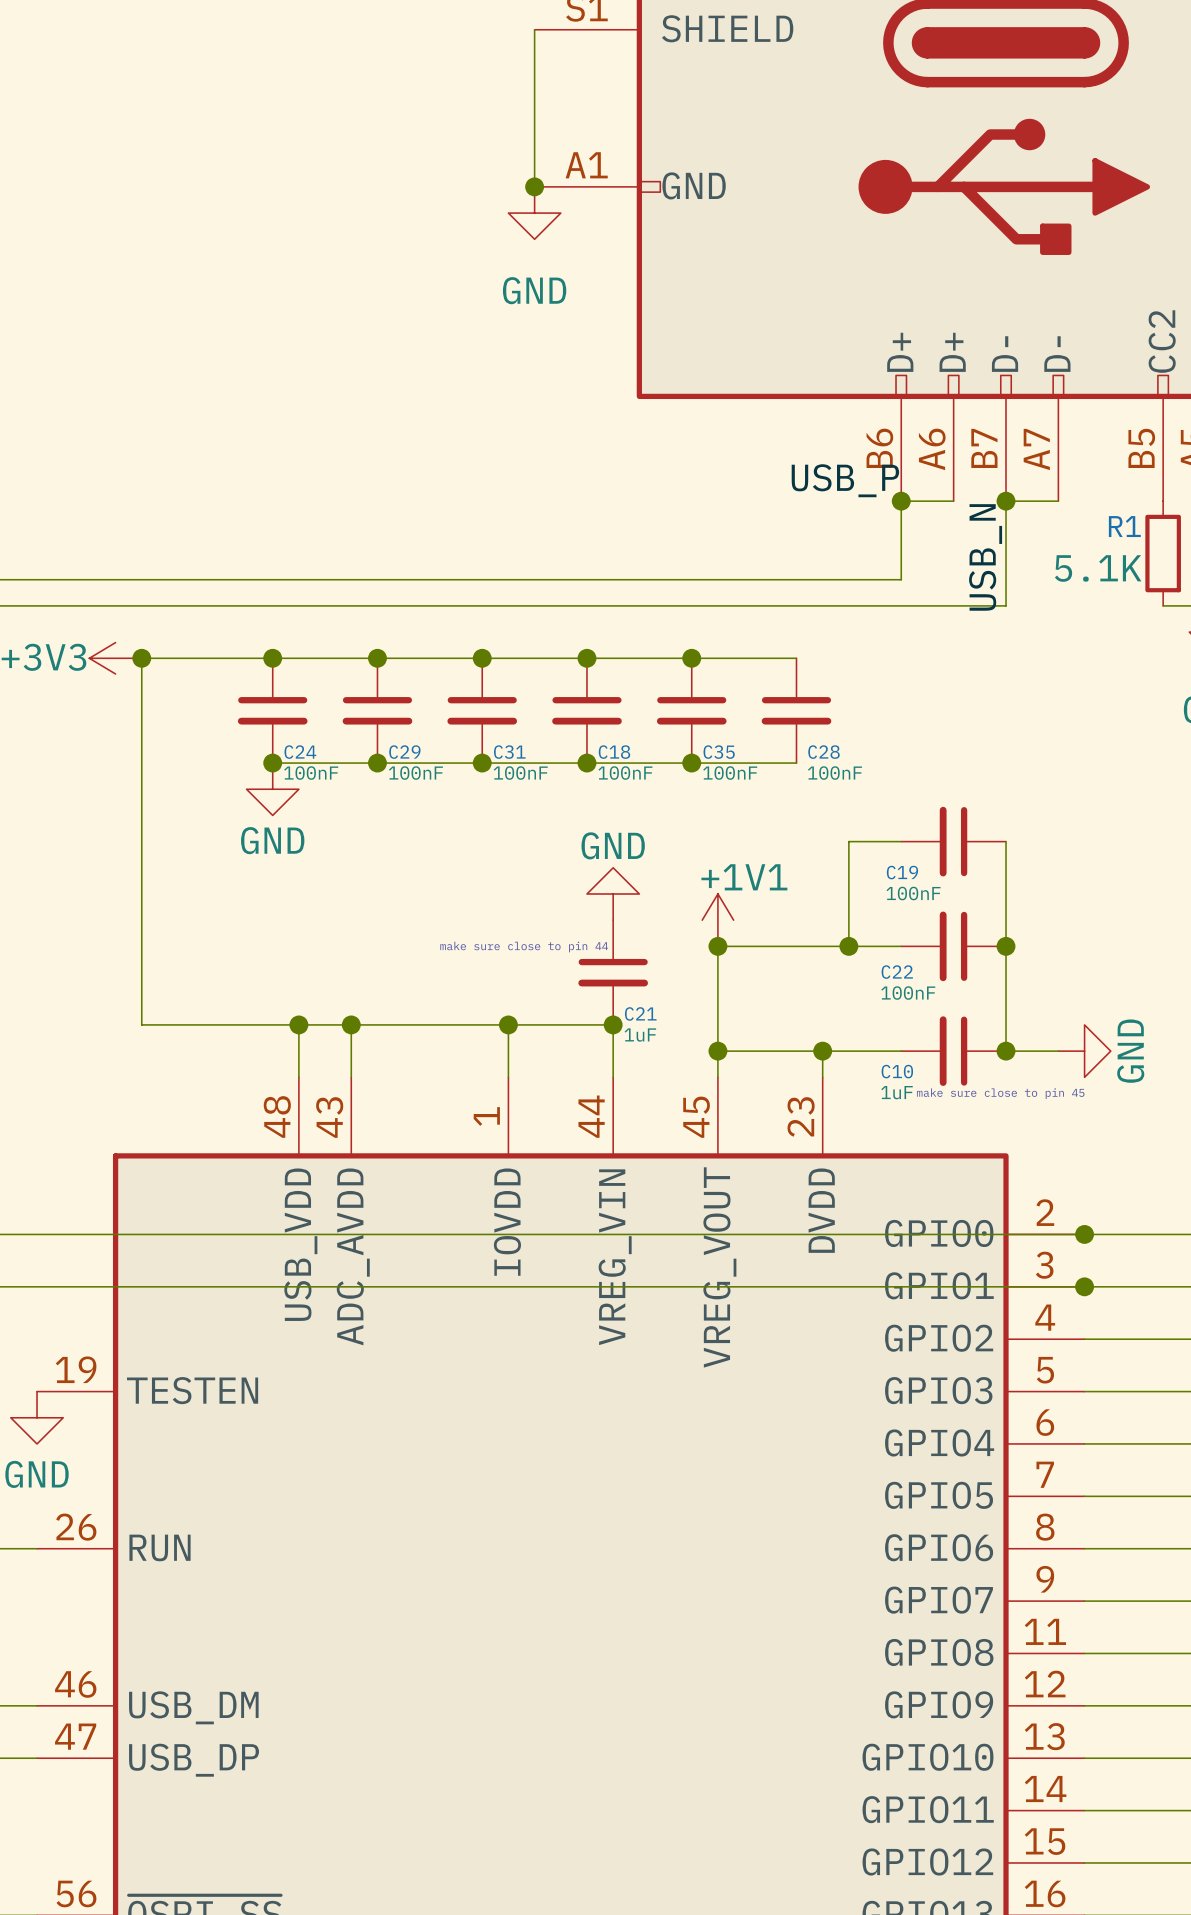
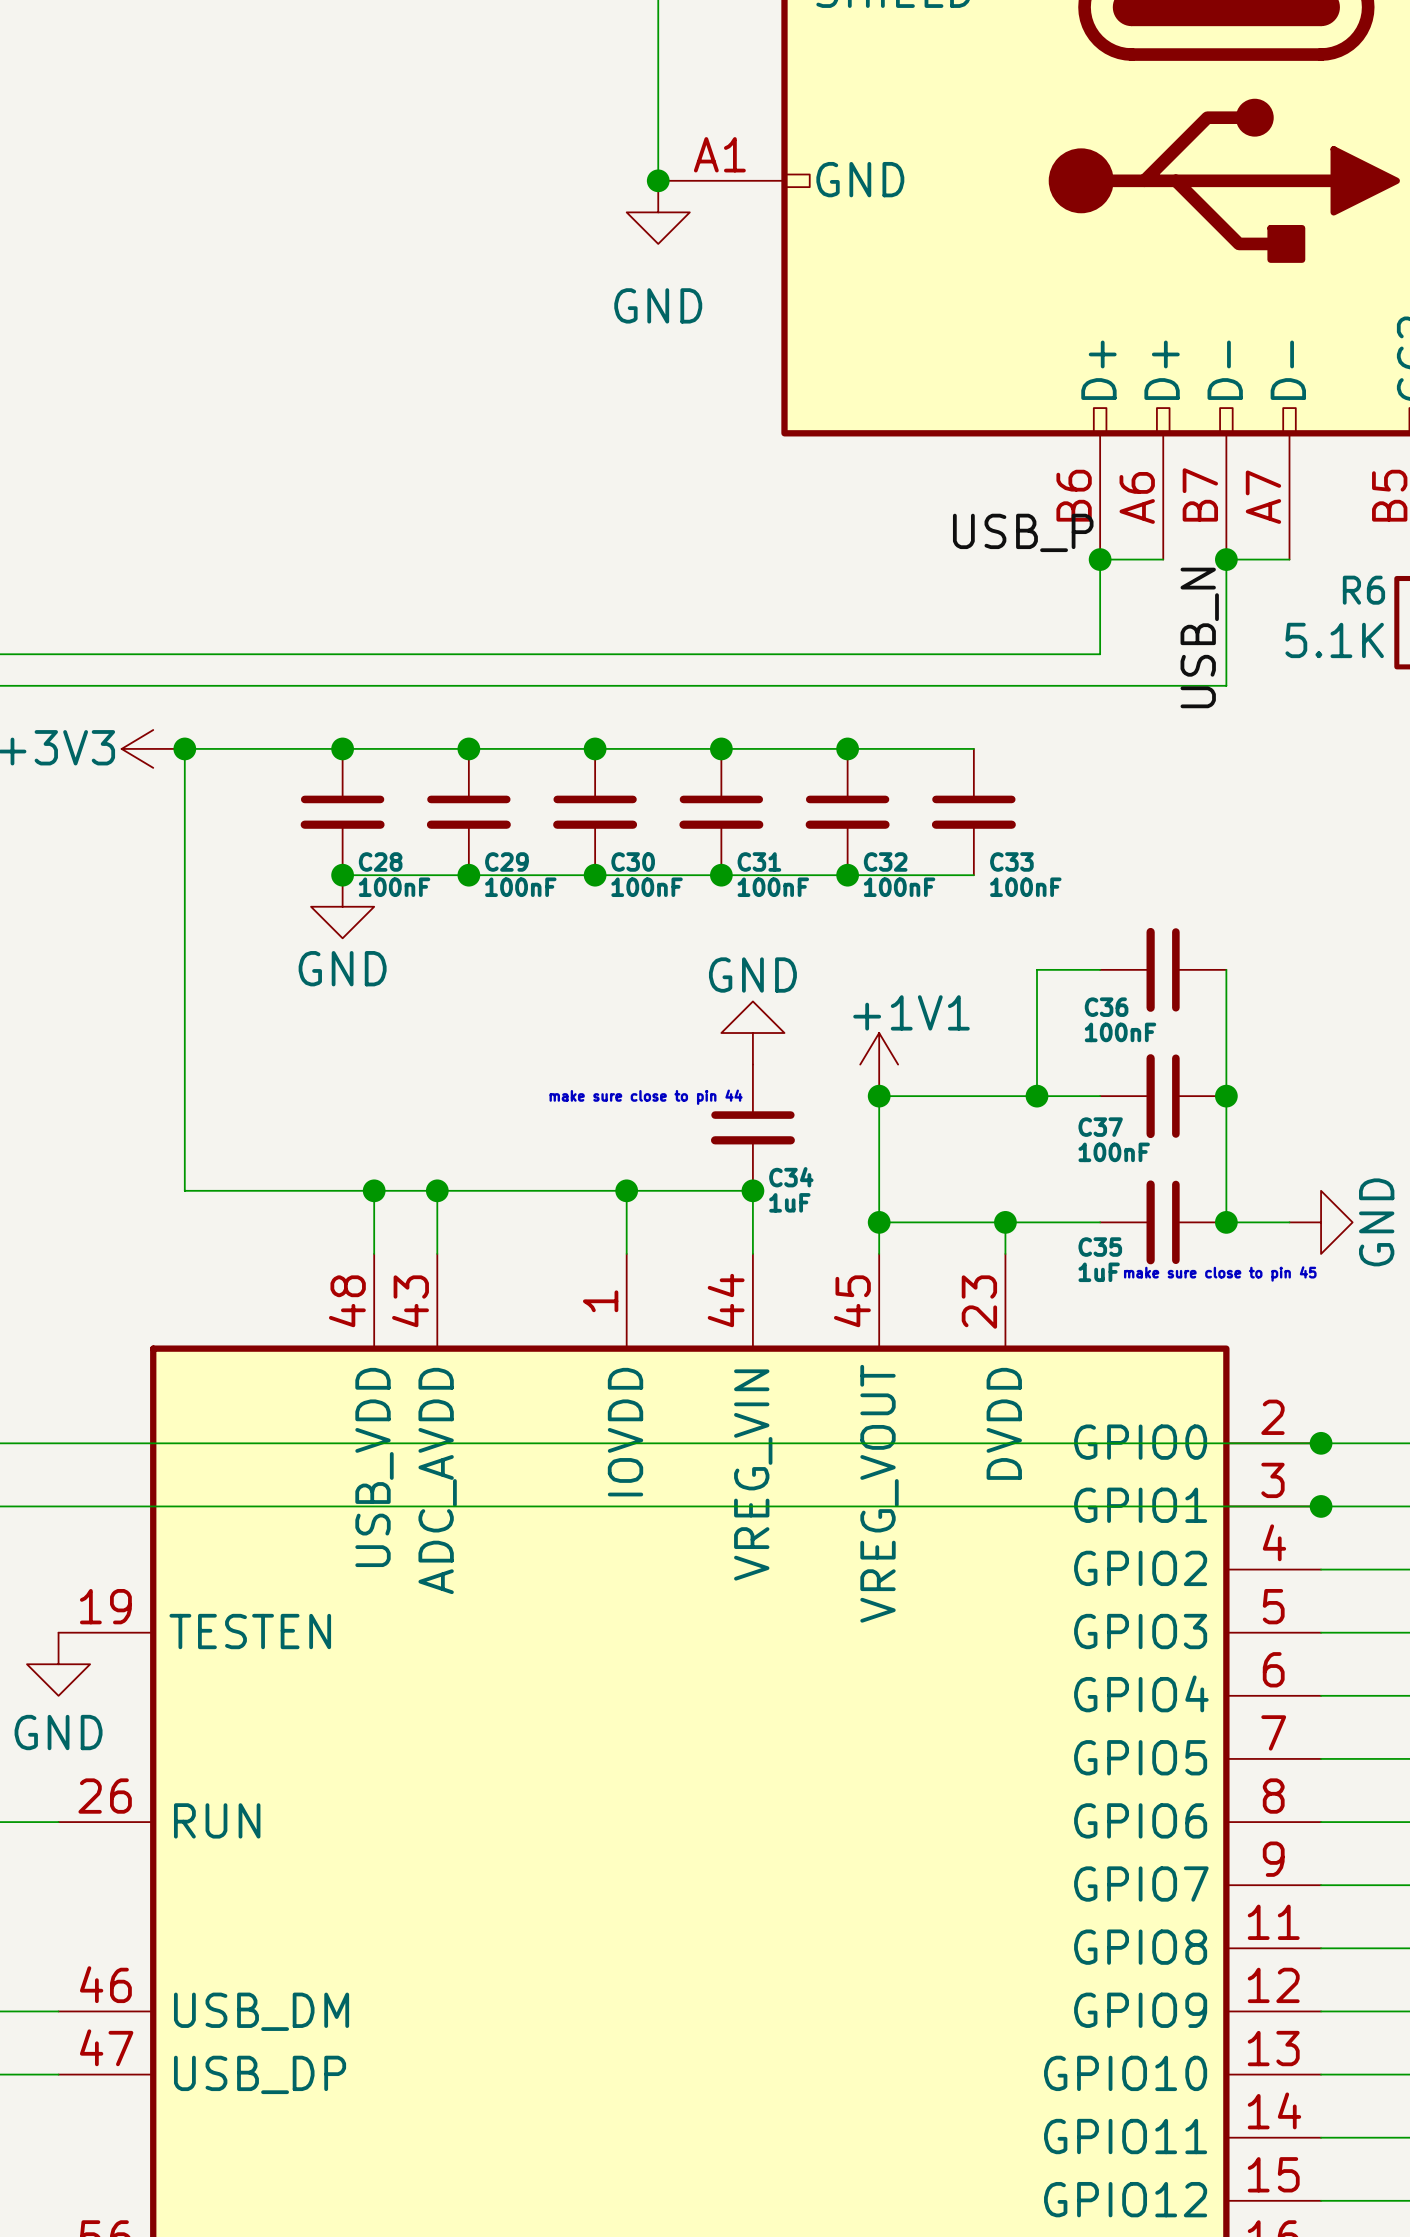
R1 name: R1 (1124, 526) -> R6 (1363, 590)
C24 name: C24 (300, 752) -> C28 (380, 861)
C31 name: C31 (509, 752) -> C30 (633, 861)
C18 name: C18 (614, 752) -> C31 (759, 861)
C35 name: C35 (719, 752) -> C32 (885, 861)
C28 name: C28 (824, 752) -> C33 (1011, 861)
C19 name: C19 (902, 872) -> C36 (1106, 1007)
C22 name: C22 (897, 972) -> C37 (1100, 1127)
C21 name: C21 (640, 1013) -> C34 (791, 1177)
C10 name: C10 (897, 1071) -> C35 (1100, 1247)

